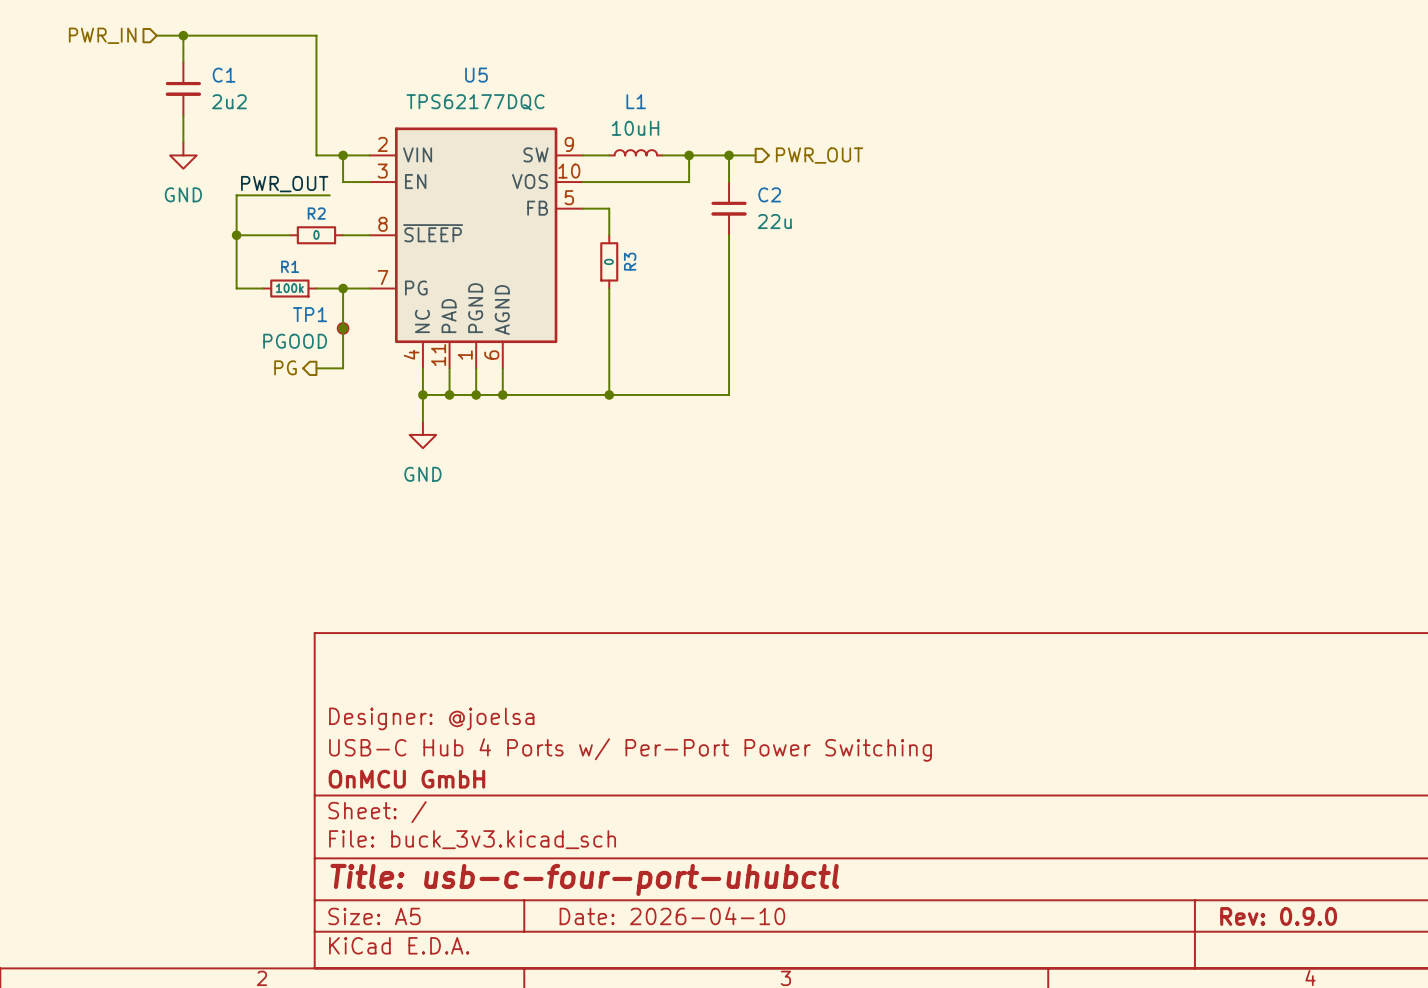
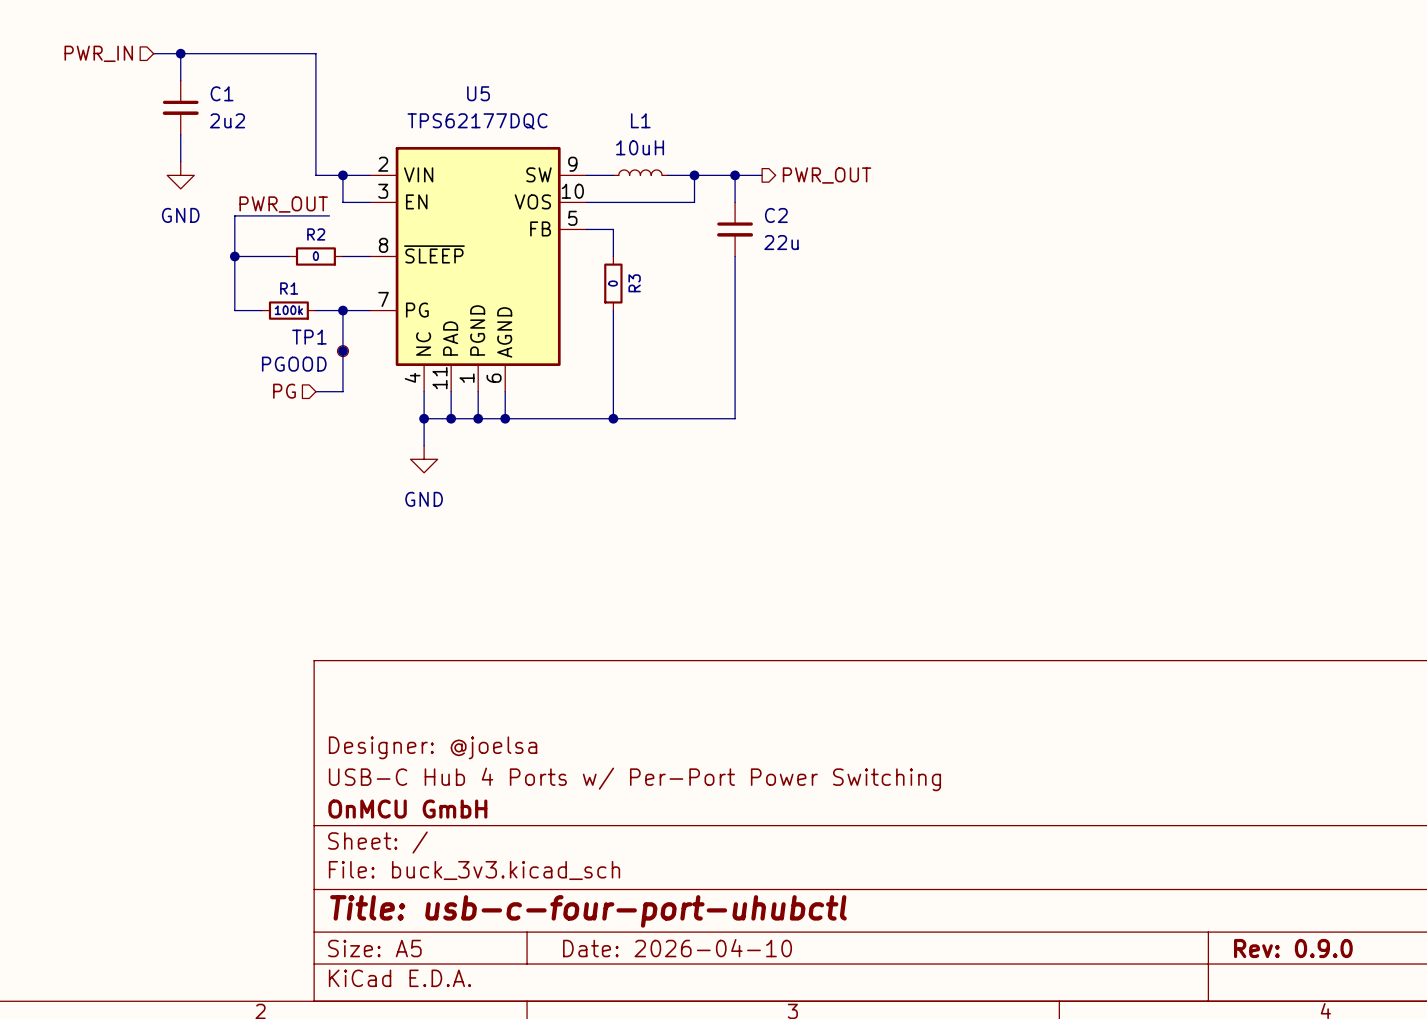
hierarchical label shape: output (285, 367) -> input (284, 391)

